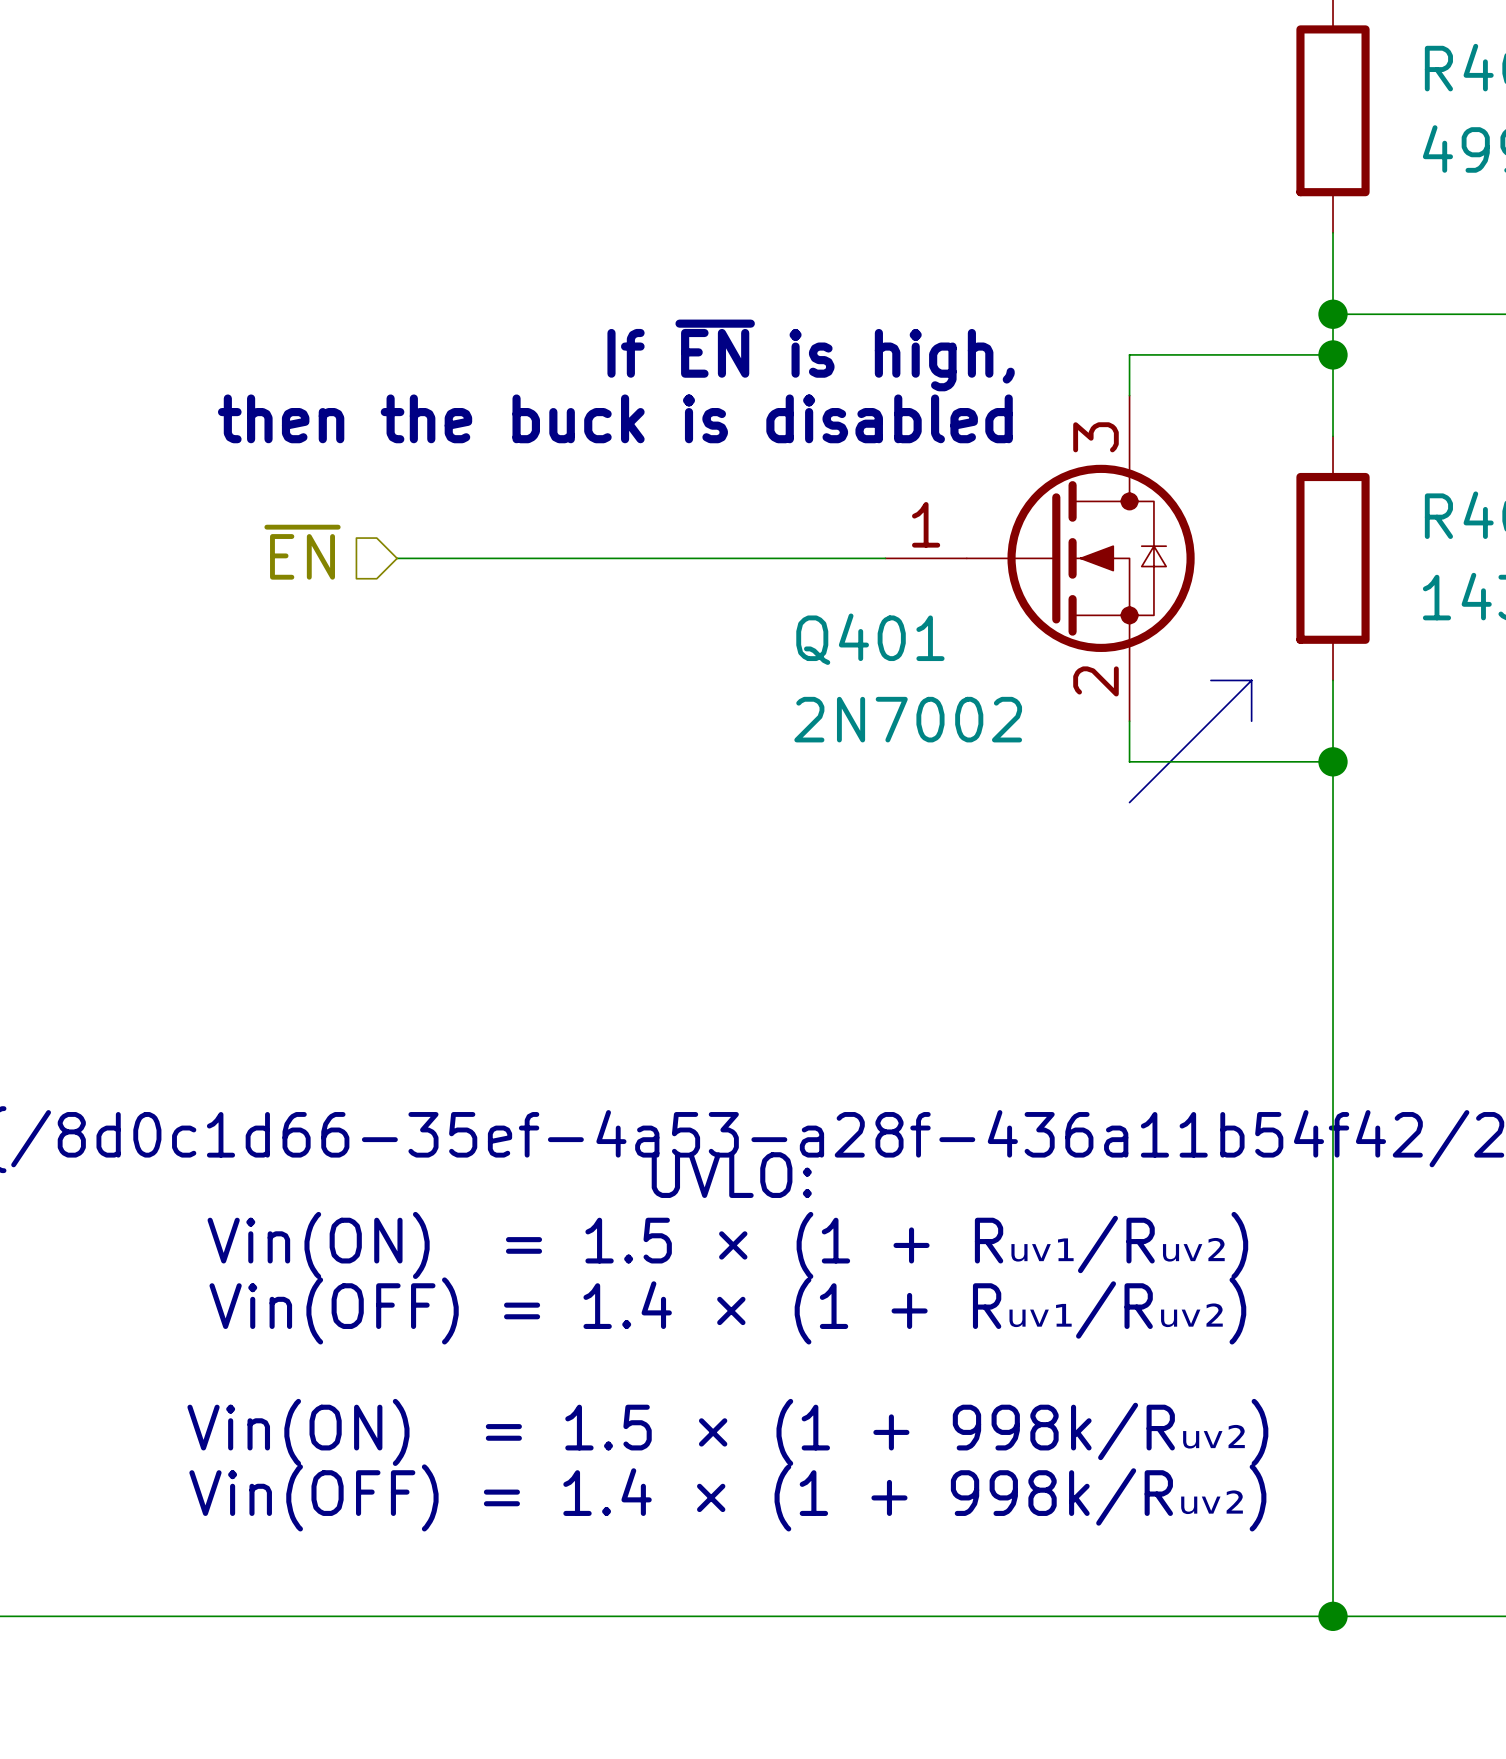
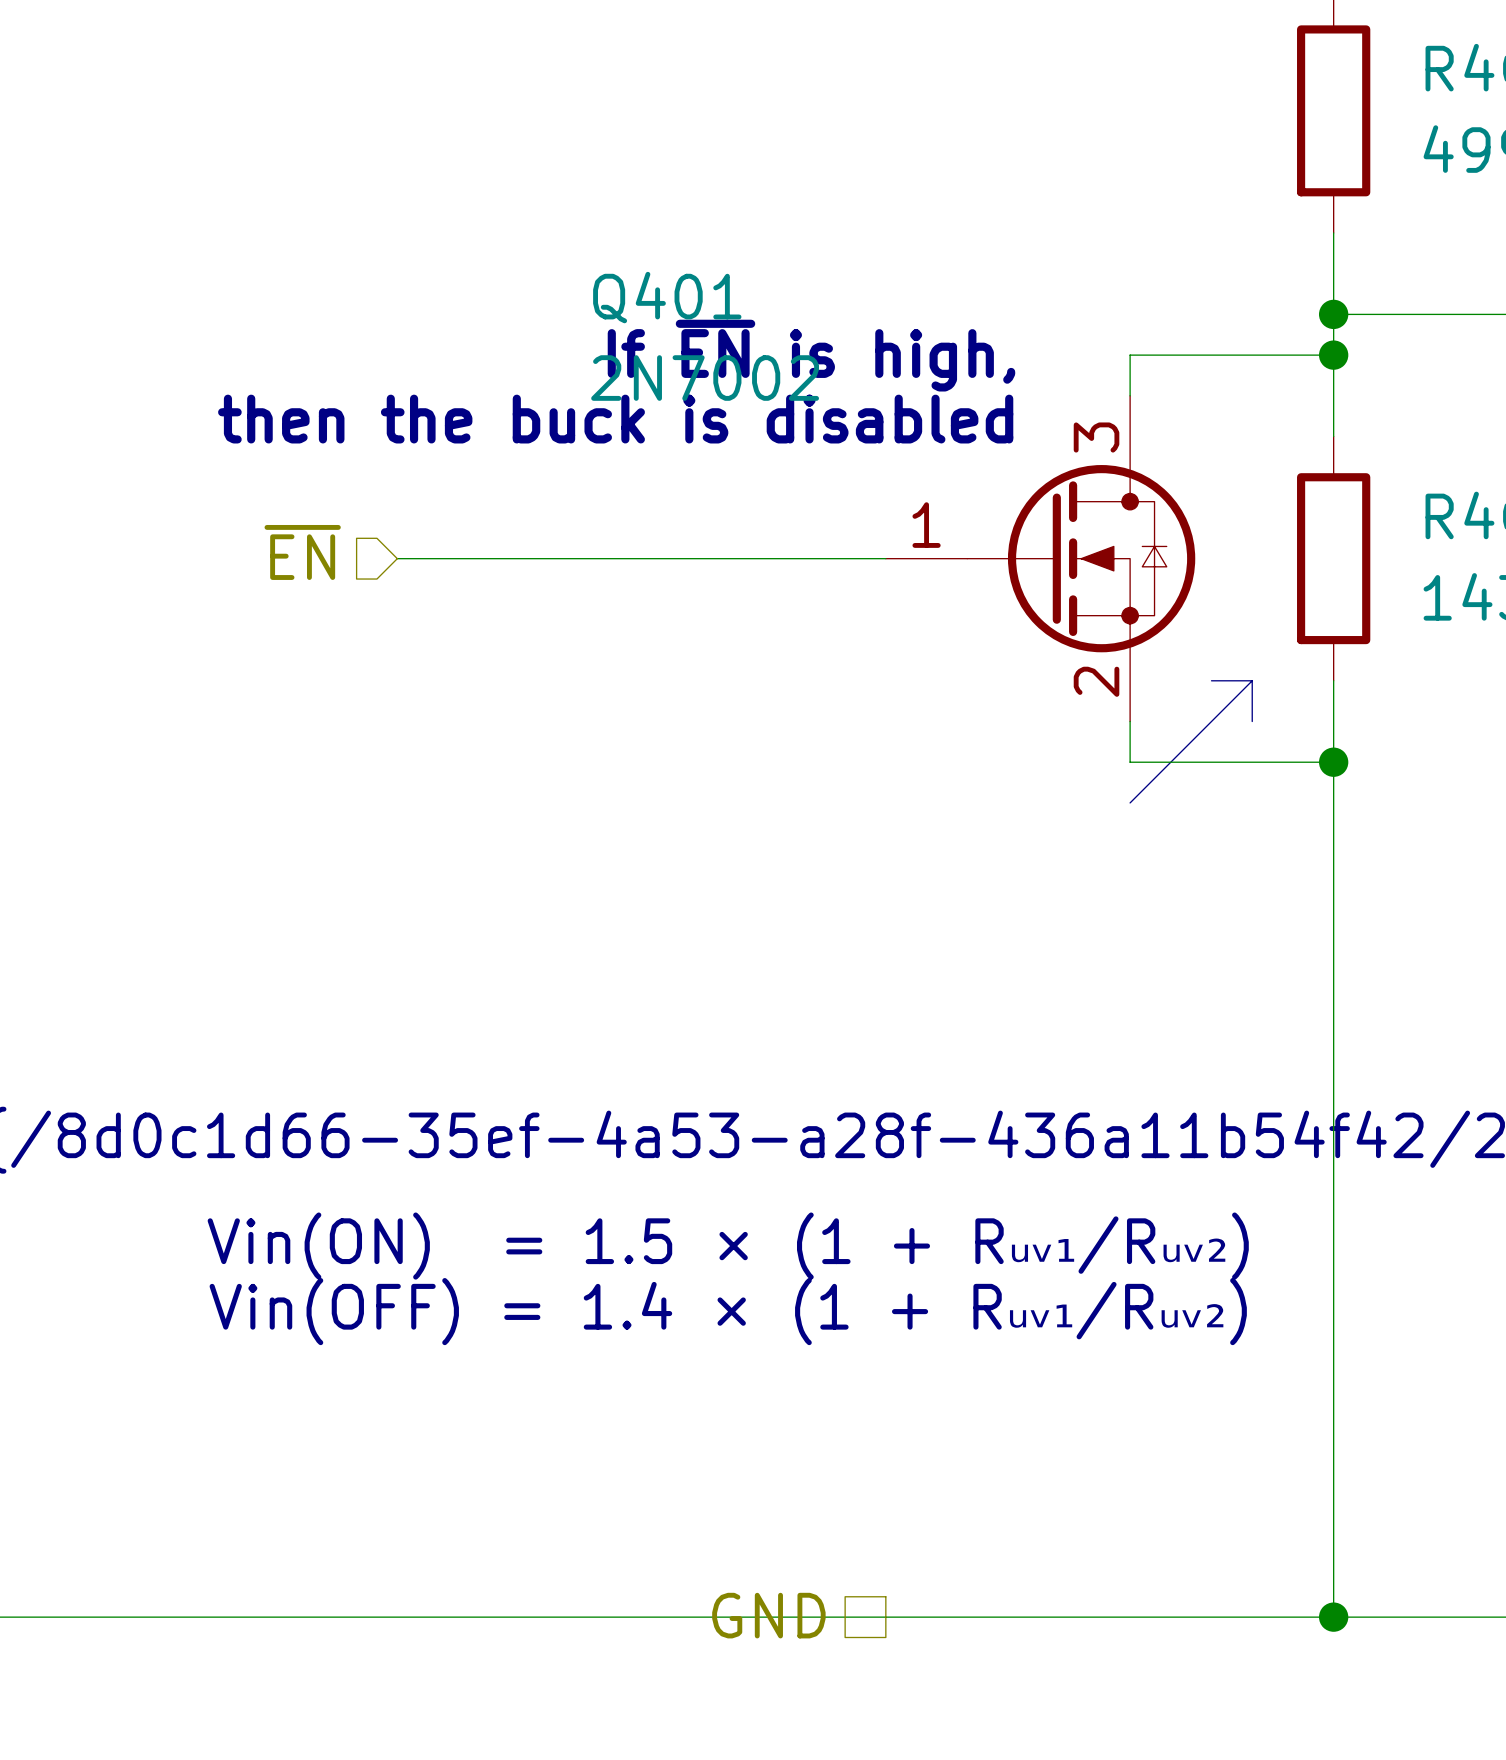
Q401 name position: Q401 (870, 639) -> Q401 (667, 297)
Q401 value position: 2N7002 (908, 719) -> 2N7002 (705, 378)
text: UVLO: (731, 1175) -> none
text: Vin(ON) = 1.5 × (1 + 998k/Rᵤᵥ₂) (727, 1432) -> none
text: Vin(OFF) = 1.4 × (1 + 998k/Rᵤᵥ₂) (727, 1497) -> none
hierarchical label: none -> GND (768, 1615)

